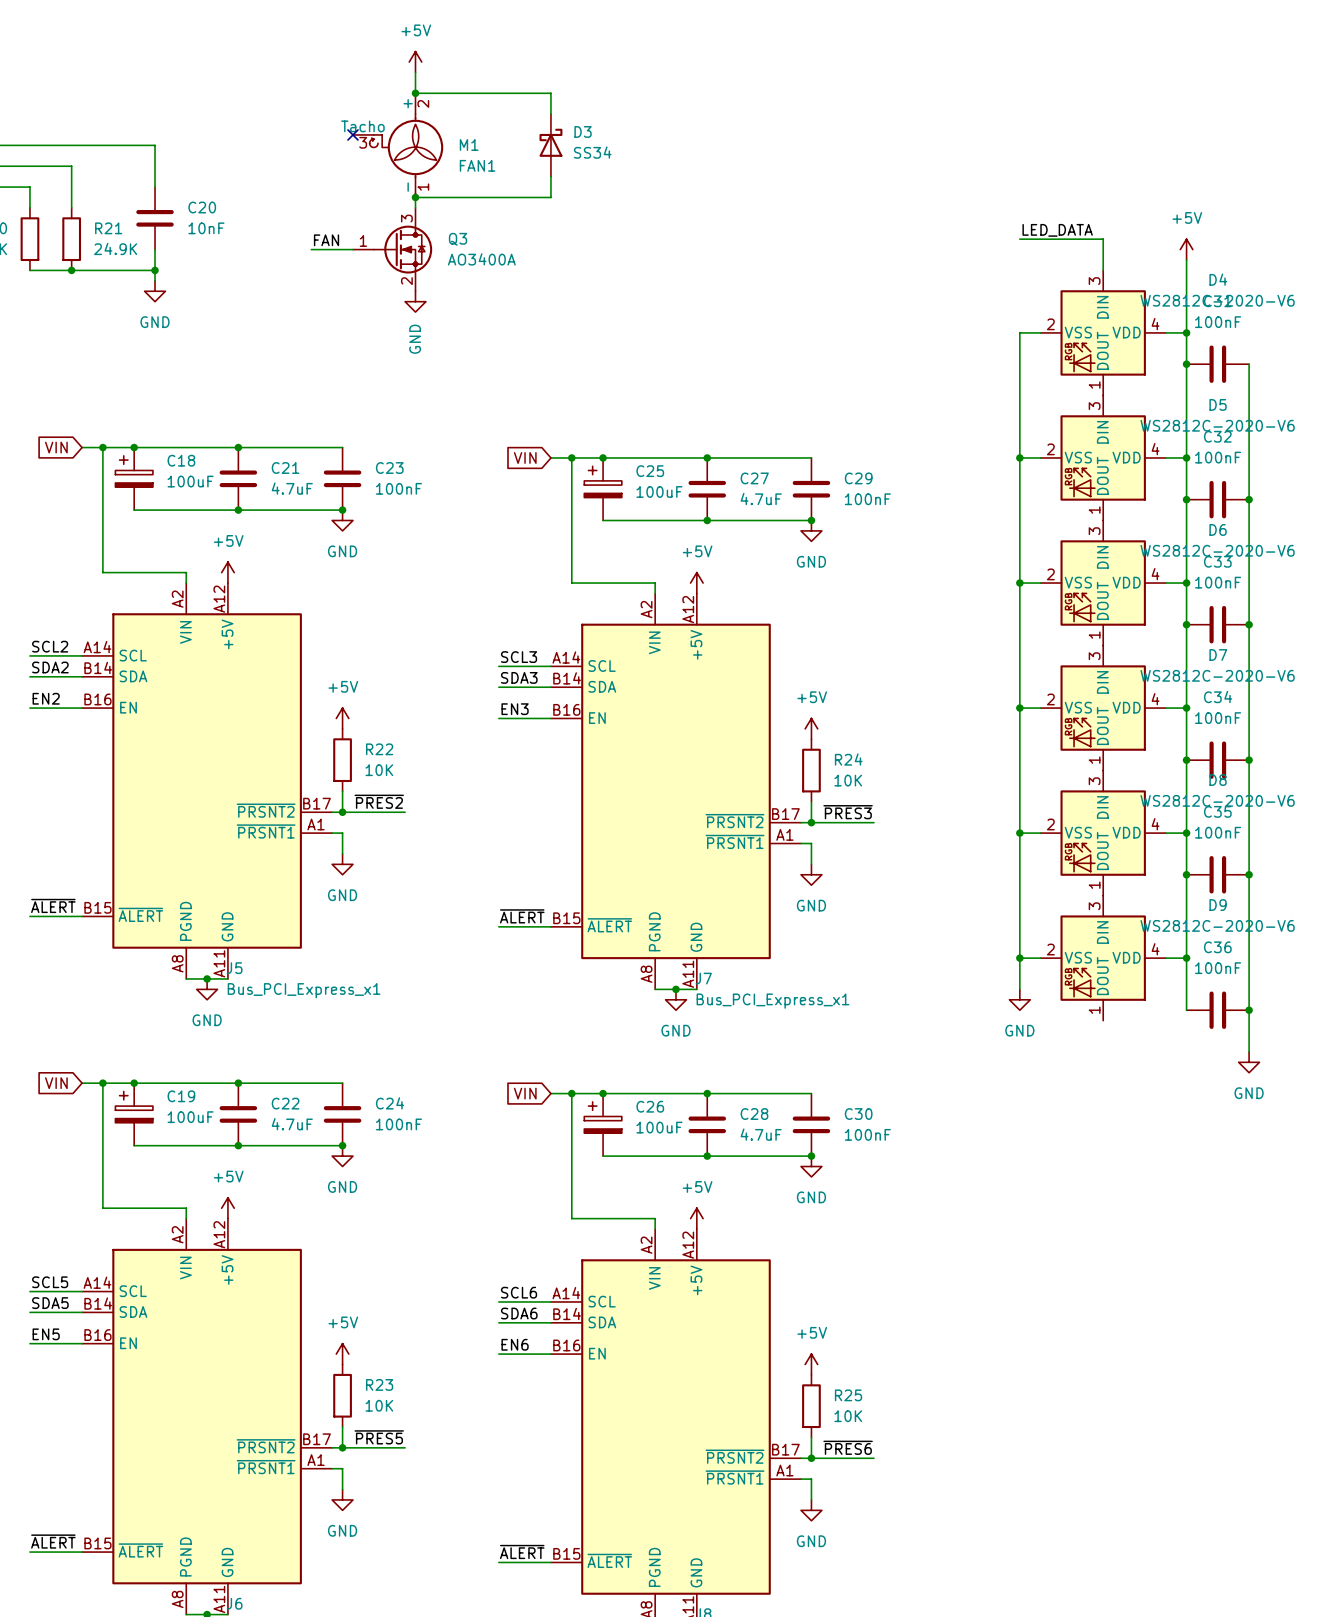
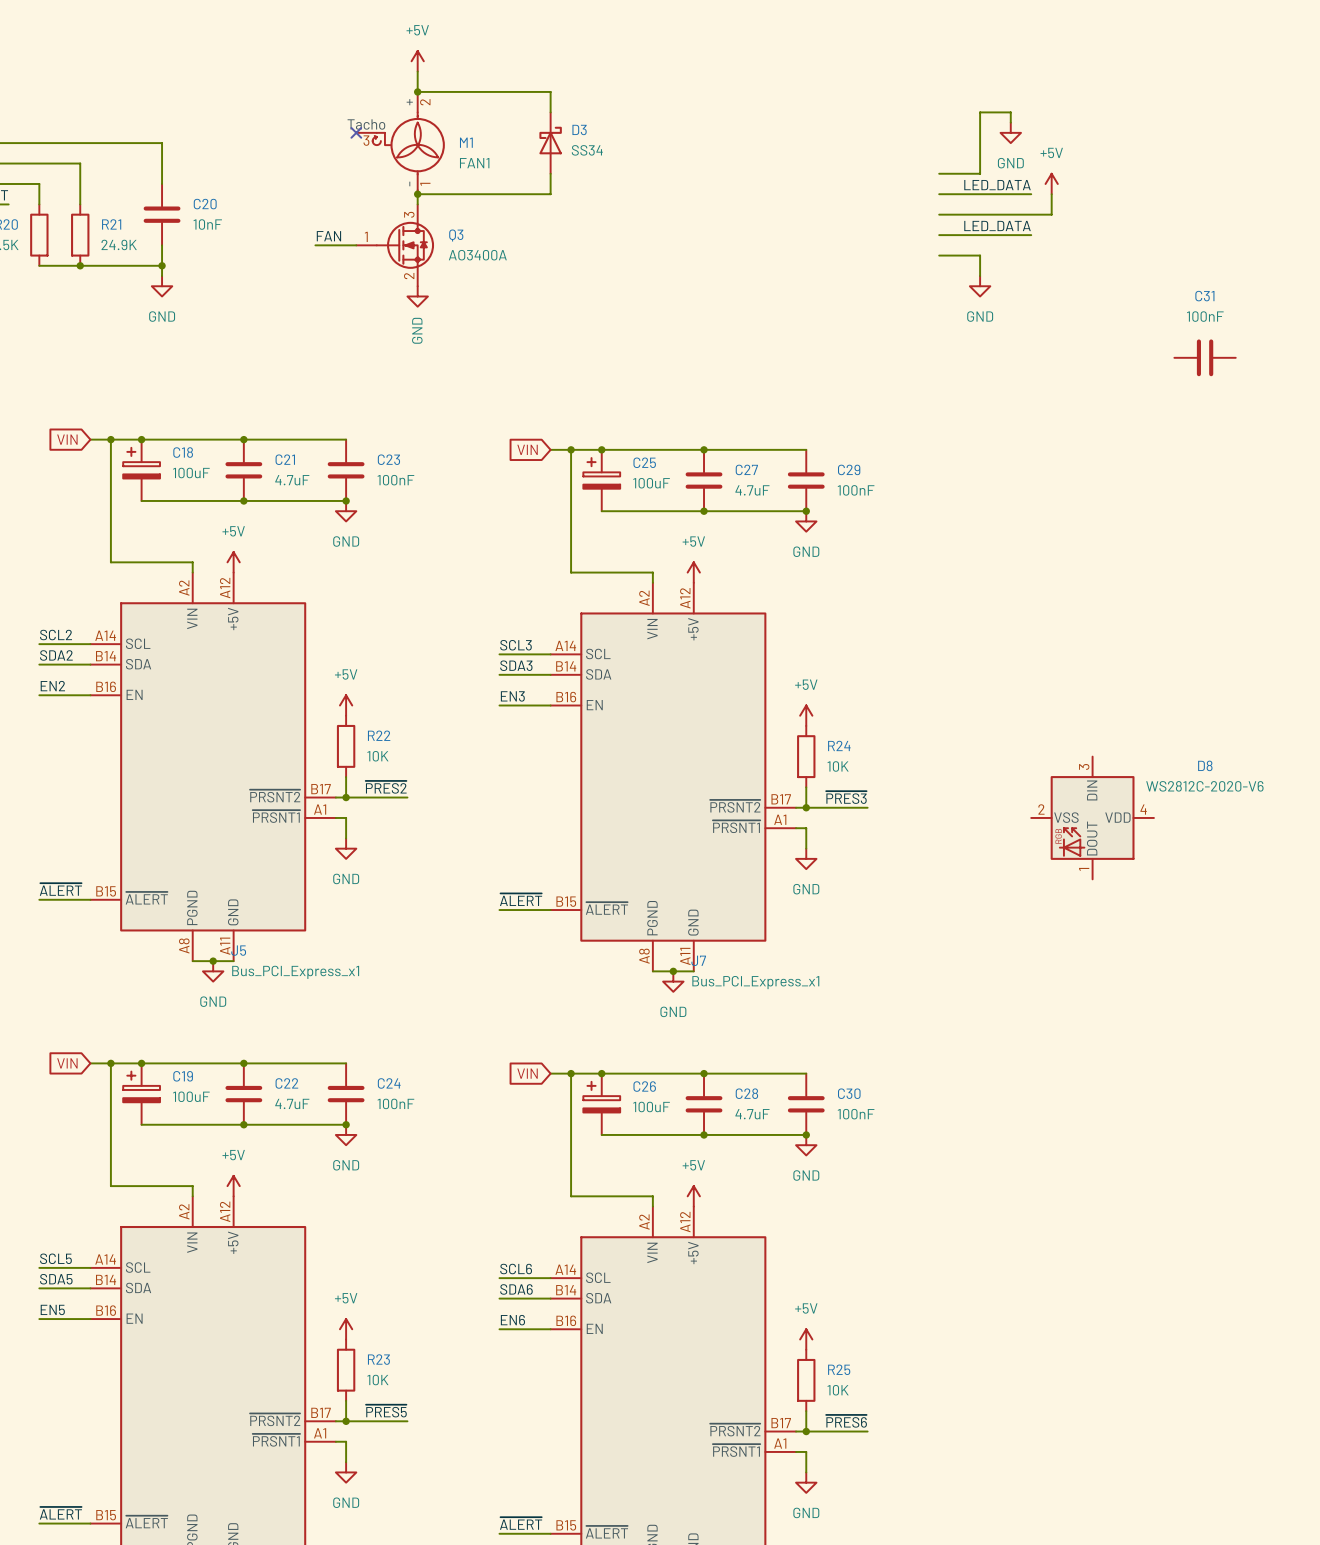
wire: none -> (1010, 122) (1010, 112) (980, 112) (980, 173) (939, 173)
power symbol: none -> GND (1010, 132)
label: none -> LED_DATA (997, 185)
wire: none -> (939, 194) (1031, 194)
wire: none -> (1051, 194) (1051, 214) (939, 214)
label position: LED_DATA (1057, 230) -> LED_DATA (997, 225)
wire: none -> (939, 235) (1010, 235)
wire: (1040, 239) (1103, 239) (1103, 270) -> none
power symbol position: +5V (1186, 249) -> +5V (1051, 183)
wire: none -> (939, 255) (980, 255) (980, 276)
wire: (1186, 260) (1186, 1010) -> none
power symbol: none -> GND (980, 286)
wire: (1040, 332) (1019, 332) (1019, 989) -> none
D4: WS2812C-2020-V6 (1103, 332) -> none
wire: (1165, 332) (1186, 332) -> none
junction: (1186, 332) -> none
junction: (1186, 364) -> none
wire: (1249, 364) (1249, 1051) -> none
wire: (1019, 457) (1040, 457) -> none
junction: (1019, 457) -> none
D5: WS2812C-2020-V6 (1103, 457) -> none
wire: (1165, 457) (1186, 457) -> none
junction: (1186, 457) -> none
junction: (1186, 499) -> none
C32: 100nF (1217, 499) -> none
junction: (1249, 499) -> none
wire: (1019, 583) (1040, 583) -> none
junction: (1019, 583) -> none
D6: WS2812C-2020-V6 (1103, 583) -> none
wire: (1165, 583) (1186, 583) -> none
junction: (1186, 583) -> none
junction: (1186, 624) -> none
C33: 100nF (1217, 624) -> none
junction: (1249, 624) -> none
wire: (1019, 708) (1040, 708) -> none
junction: (1019, 708) -> none
D7: WS2812C-2020-V6 (1103, 708) -> none
wire: (1165, 708) (1186, 708) -> none
junction: (1186, 708) -> none
junction: (1186, 760) -> none
C34: 100nF (1217, 760) -> none
junction: (1249, 760) -> none
wire: (1019, 833) (1040, 833) -> none
junction: (1019, 833) -> none
wire: (1165, 833) (1186, 833) -> none
junction: (1186, 833) -> none
junction: (1186, 874) -> none
C35: 100nF (1217, 874) -> none
junction: (1249, 874) -> none
wire: (1019, 958) (1040, 958) -> none
junction: (1019, 958) -> none
D9: WS2812C-2020-V6 (1103, 958) -> none
wire: (1165, 958) (1186, 958) -> none
junction: (1186, 958) -> none
power symbol: GND (1019, 999) -> none
C36: 100nF (1217, 1010) -> none
junction: (1249, 1010) -> none
power symbol: GND (1249, 1062) -> none

